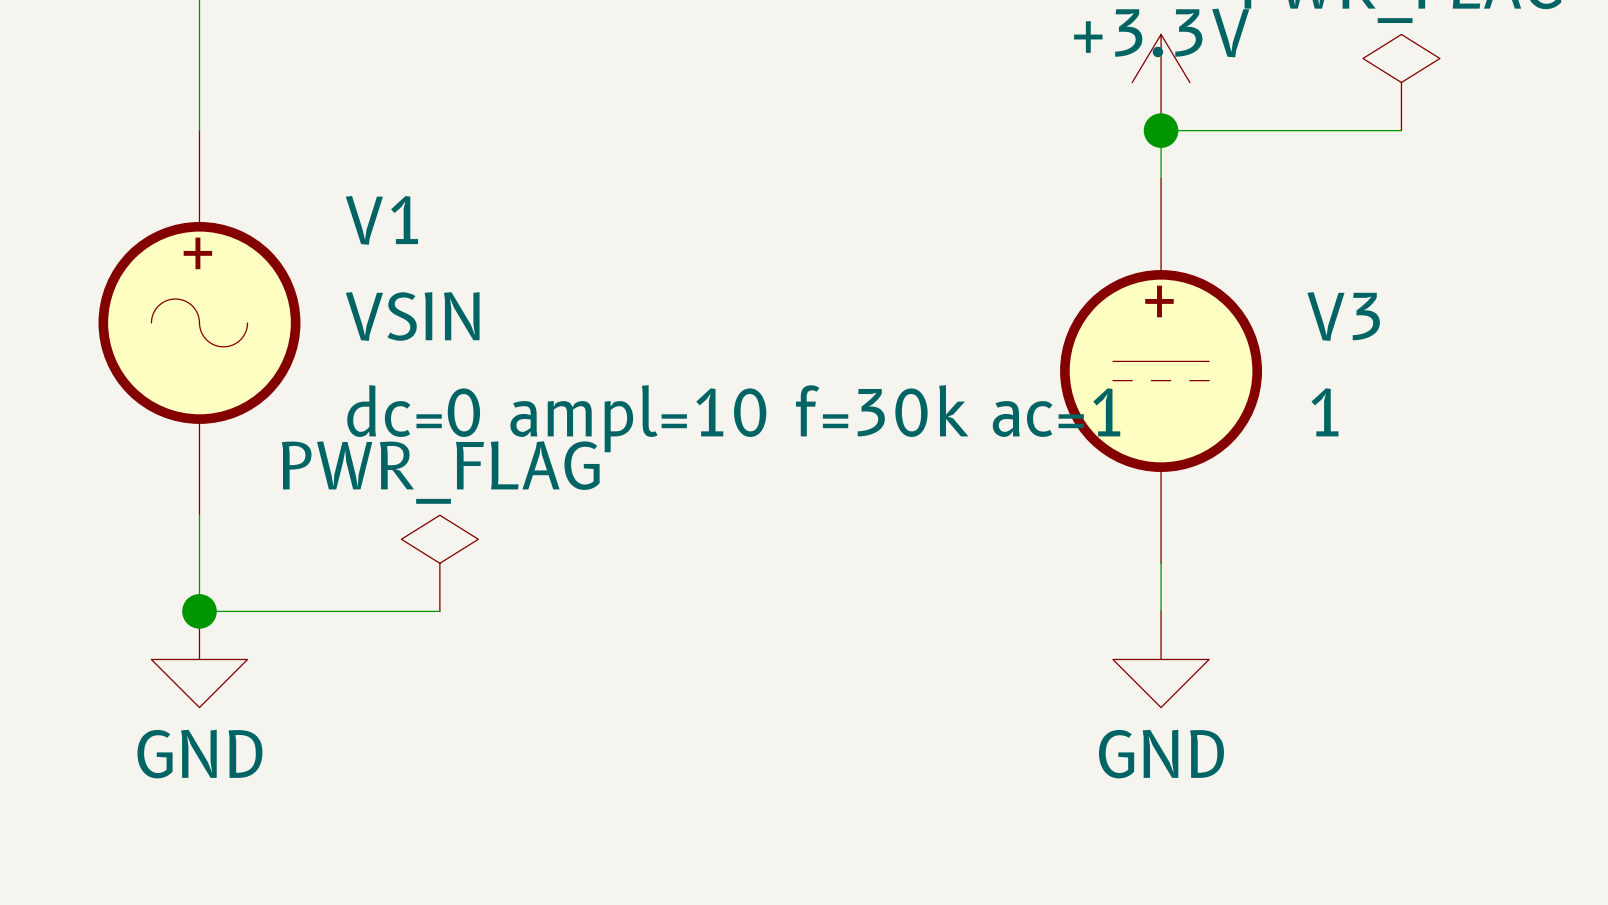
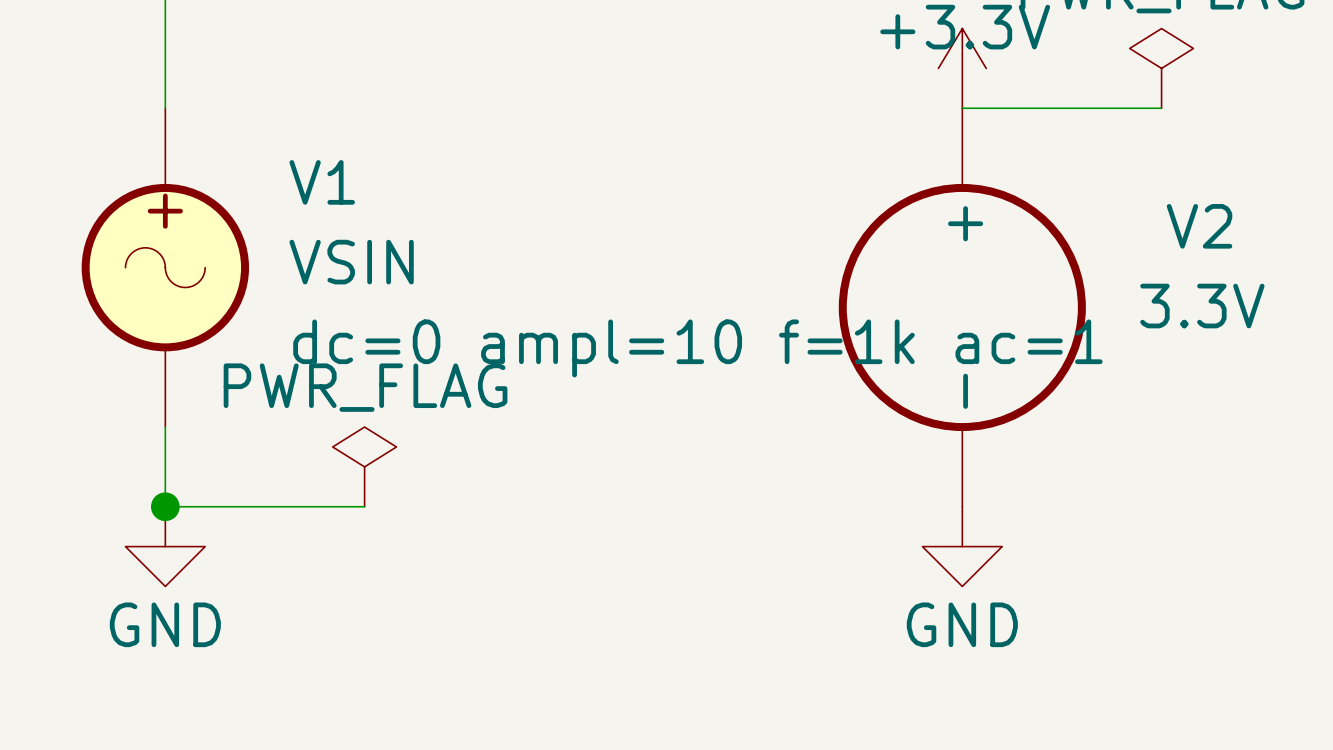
junction: (1161, 130) -> none
V3: 1 (1161, 371) -> none
V2: none -> 3.3V (962, 307)
V1 text: dc=0 ampl=10 f=30k ac=1 (733, 418) -> dc=0 ampl=10 f=1k ac=1 (697, 348)

